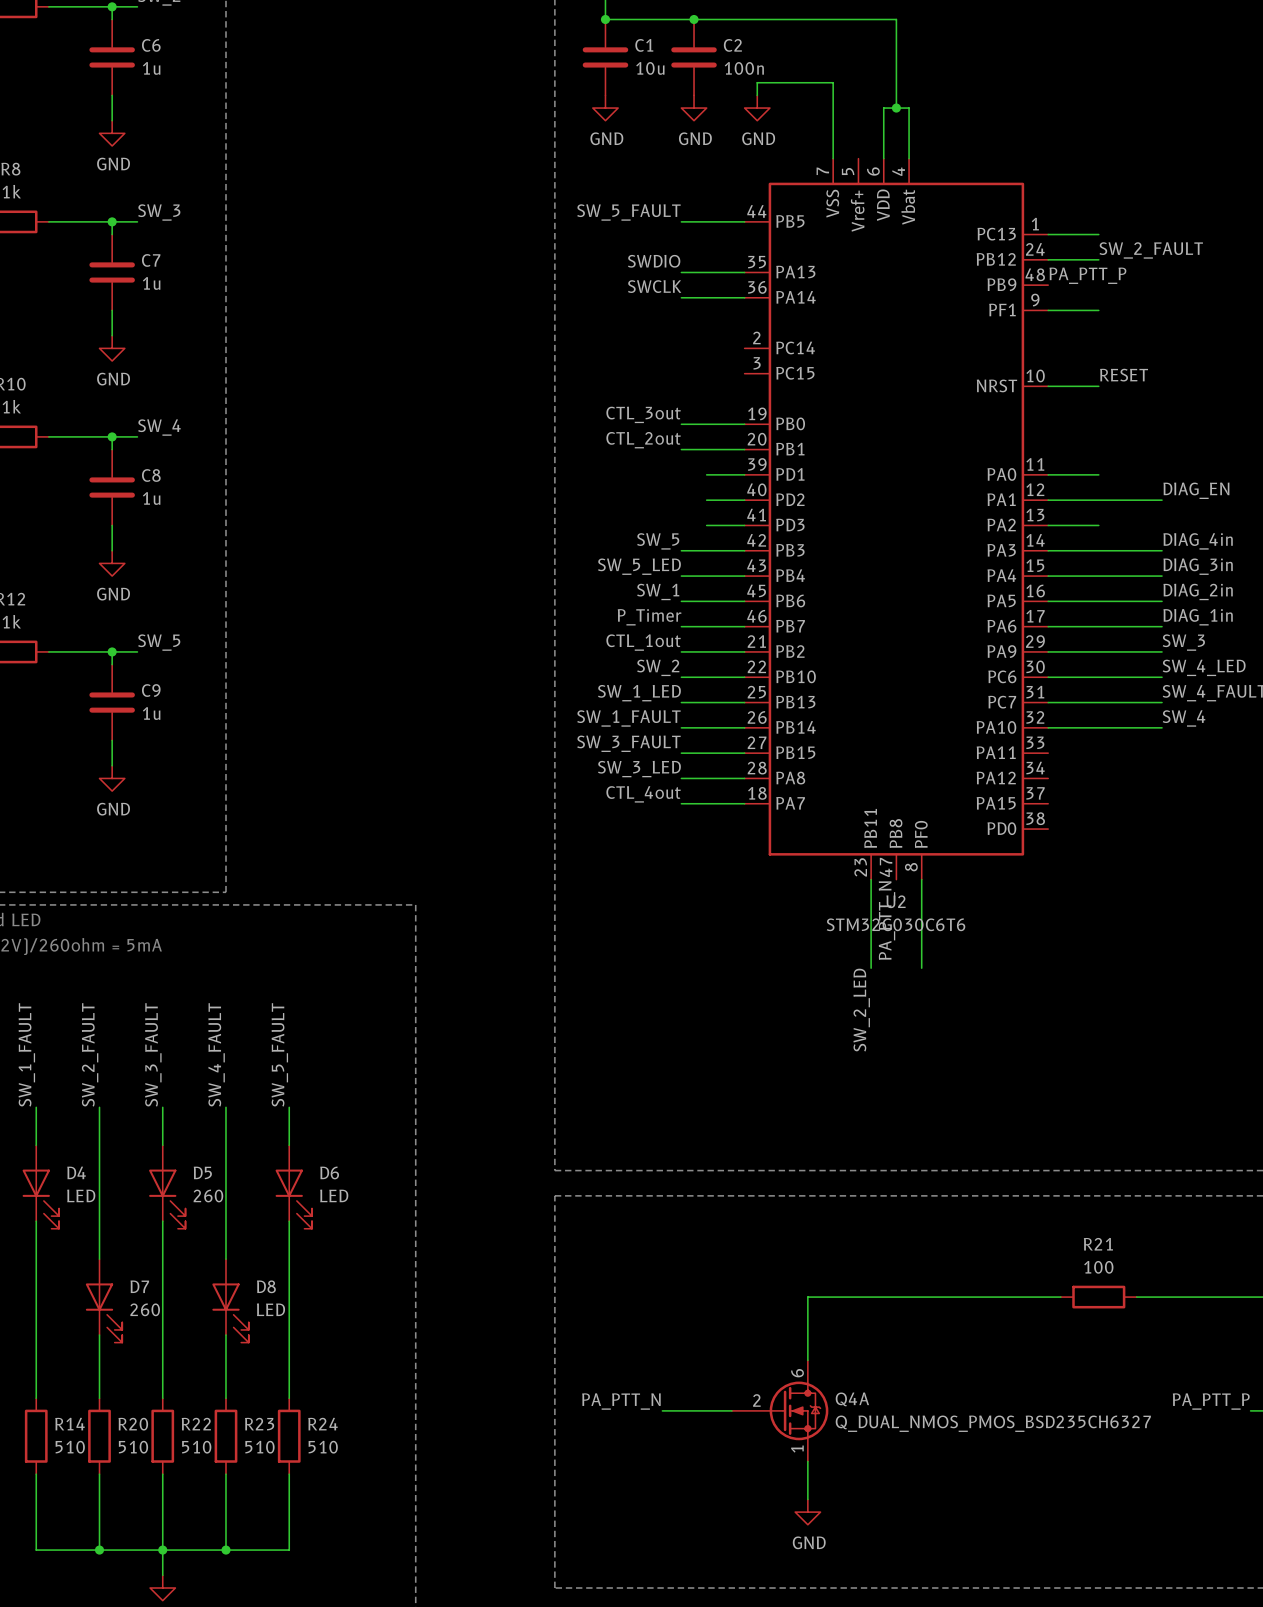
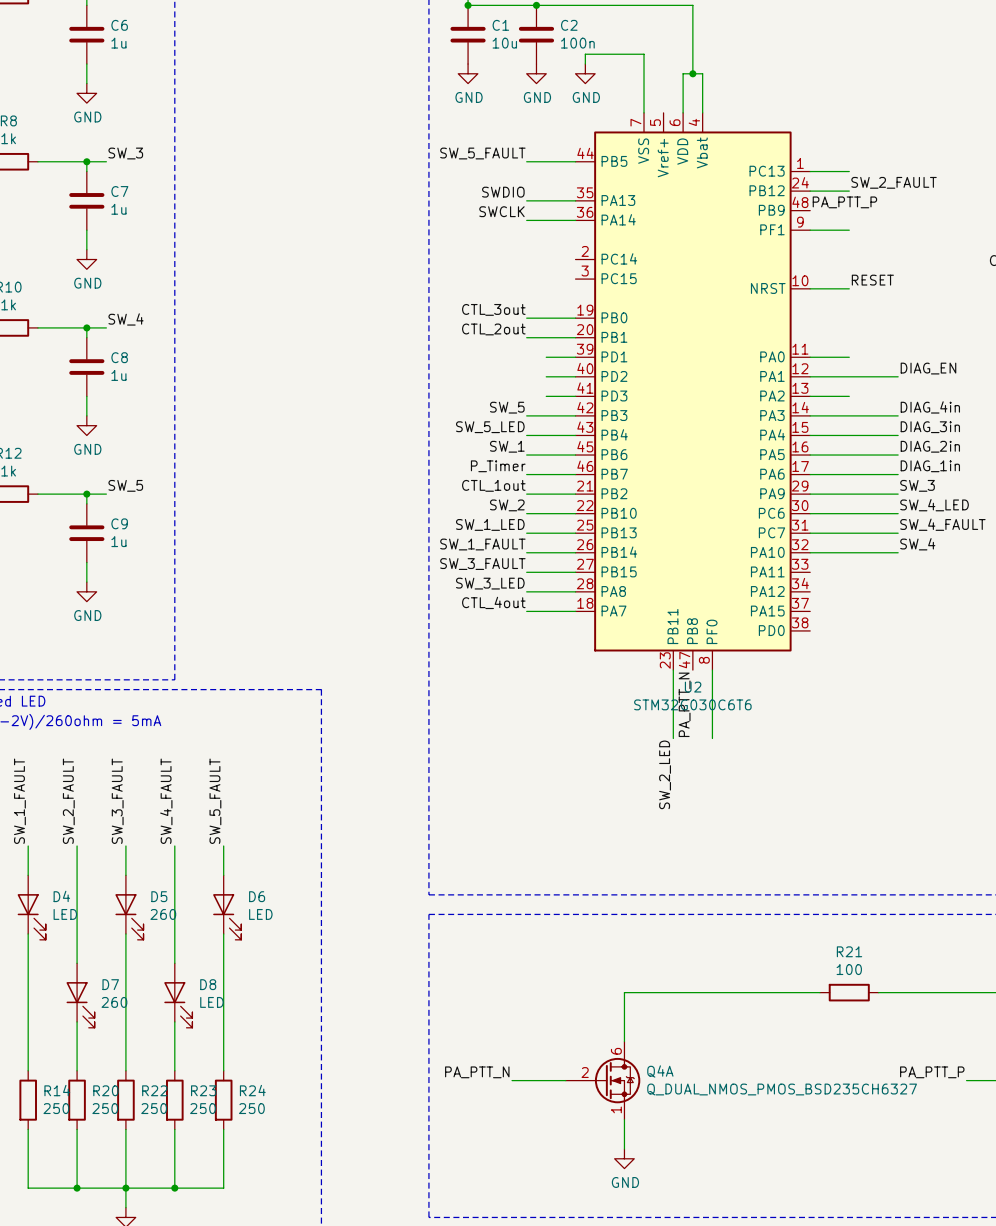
R14 value: 510 (70, 1447) -> 250 (56, 1108)
R20 value: 510 (133, 1447) -> 250 (105, 1108)
R22 value: 510 (196, 1447) -> 250 (154, 1108)
R23 value: 510 (259, 1447) -> 250 (202, 1108)
R24 value: 510 (323, 1447) -> 250 (251, 1108)

